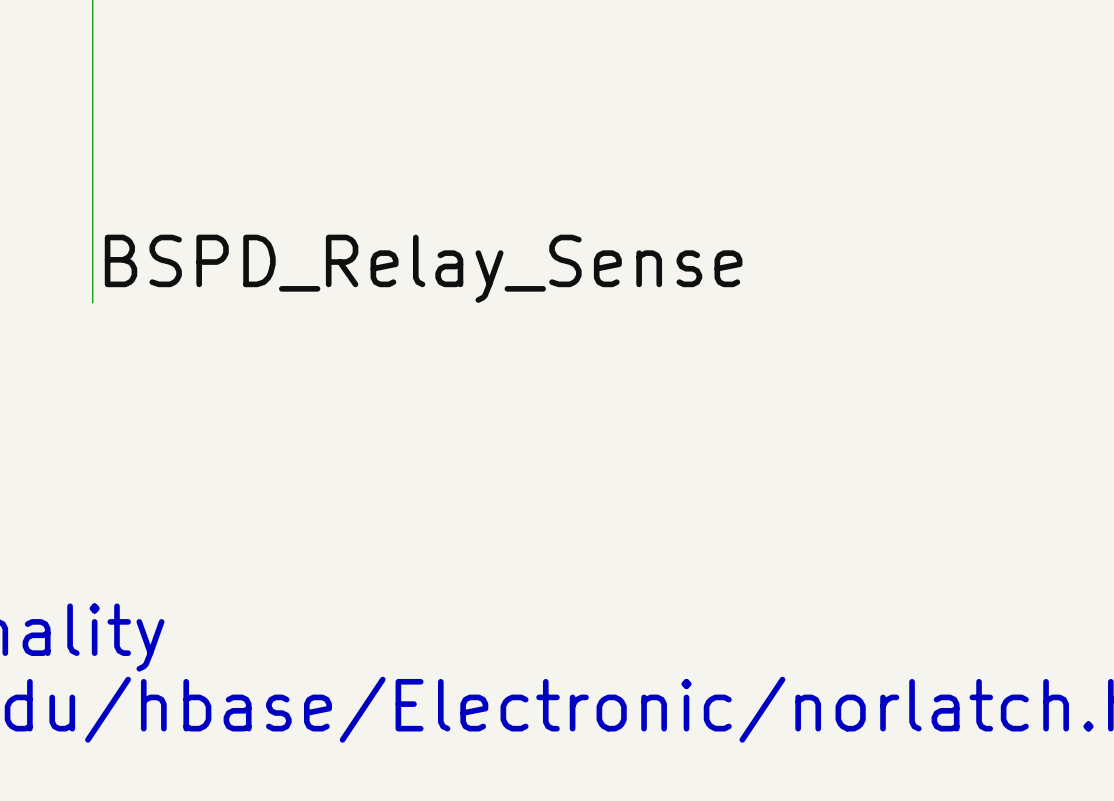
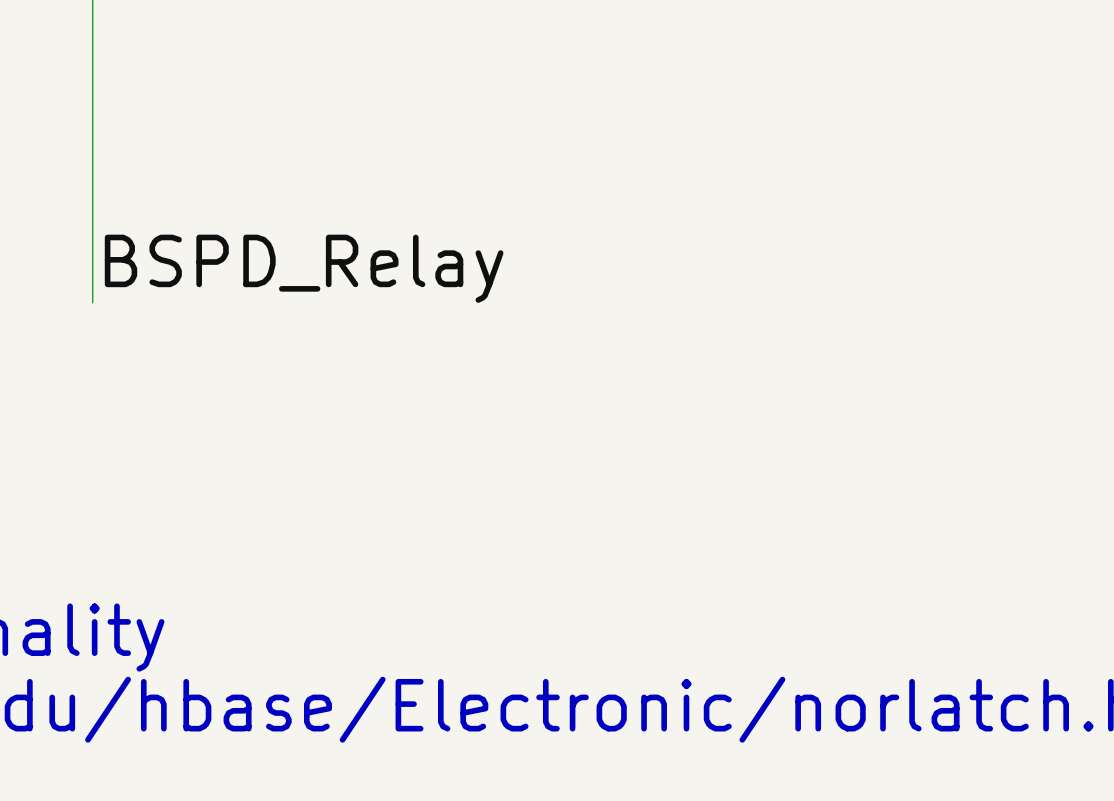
label: BSPD_Relay_Sense (423, 268) -> BSPD_Relay (304, 268)

